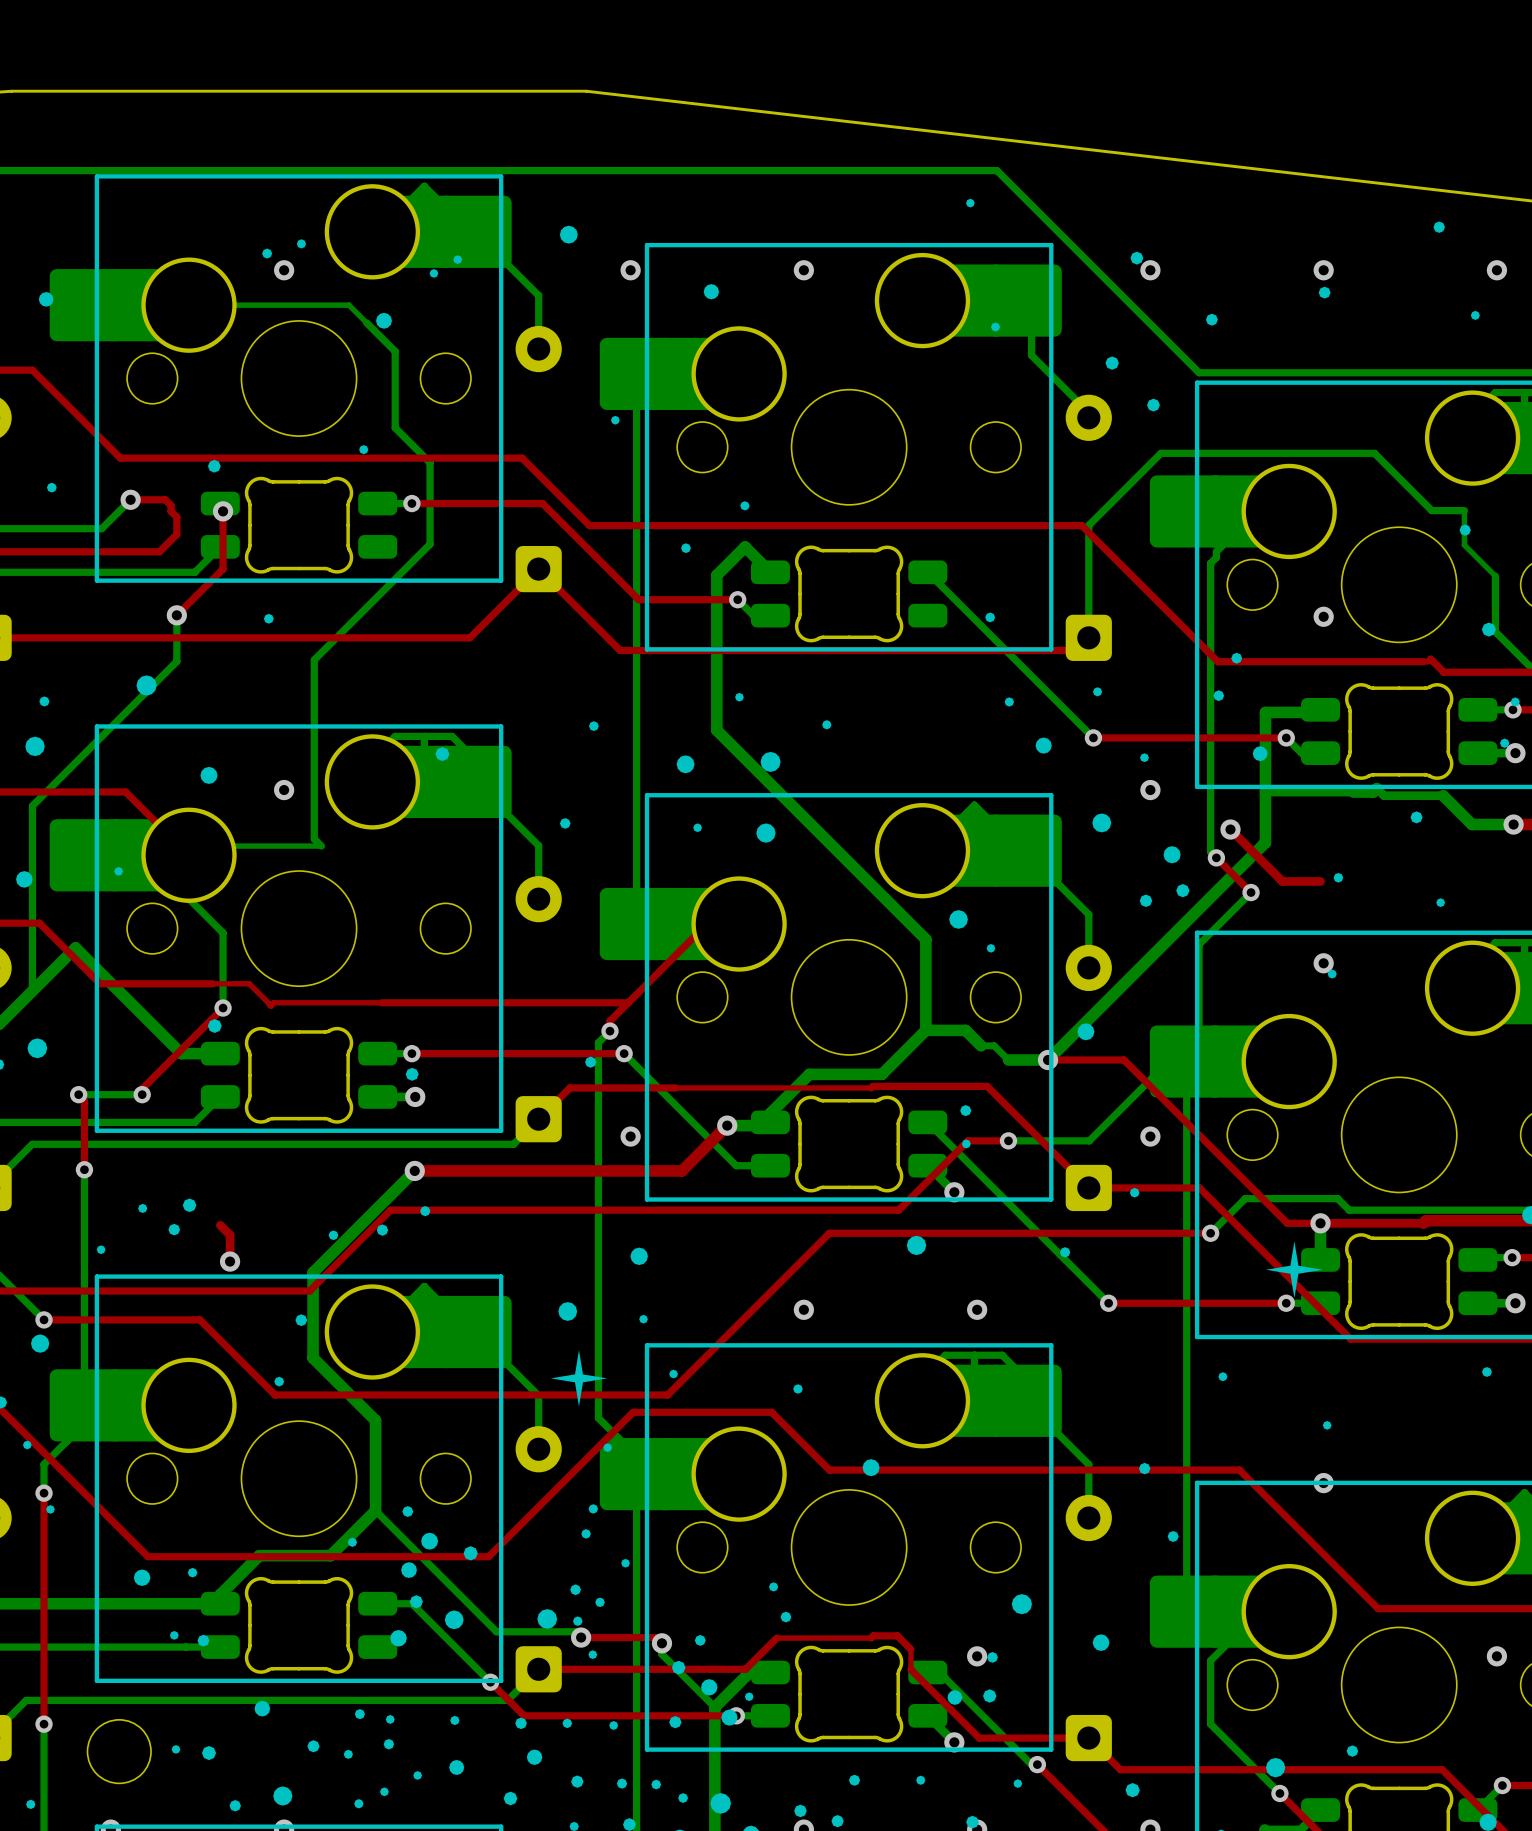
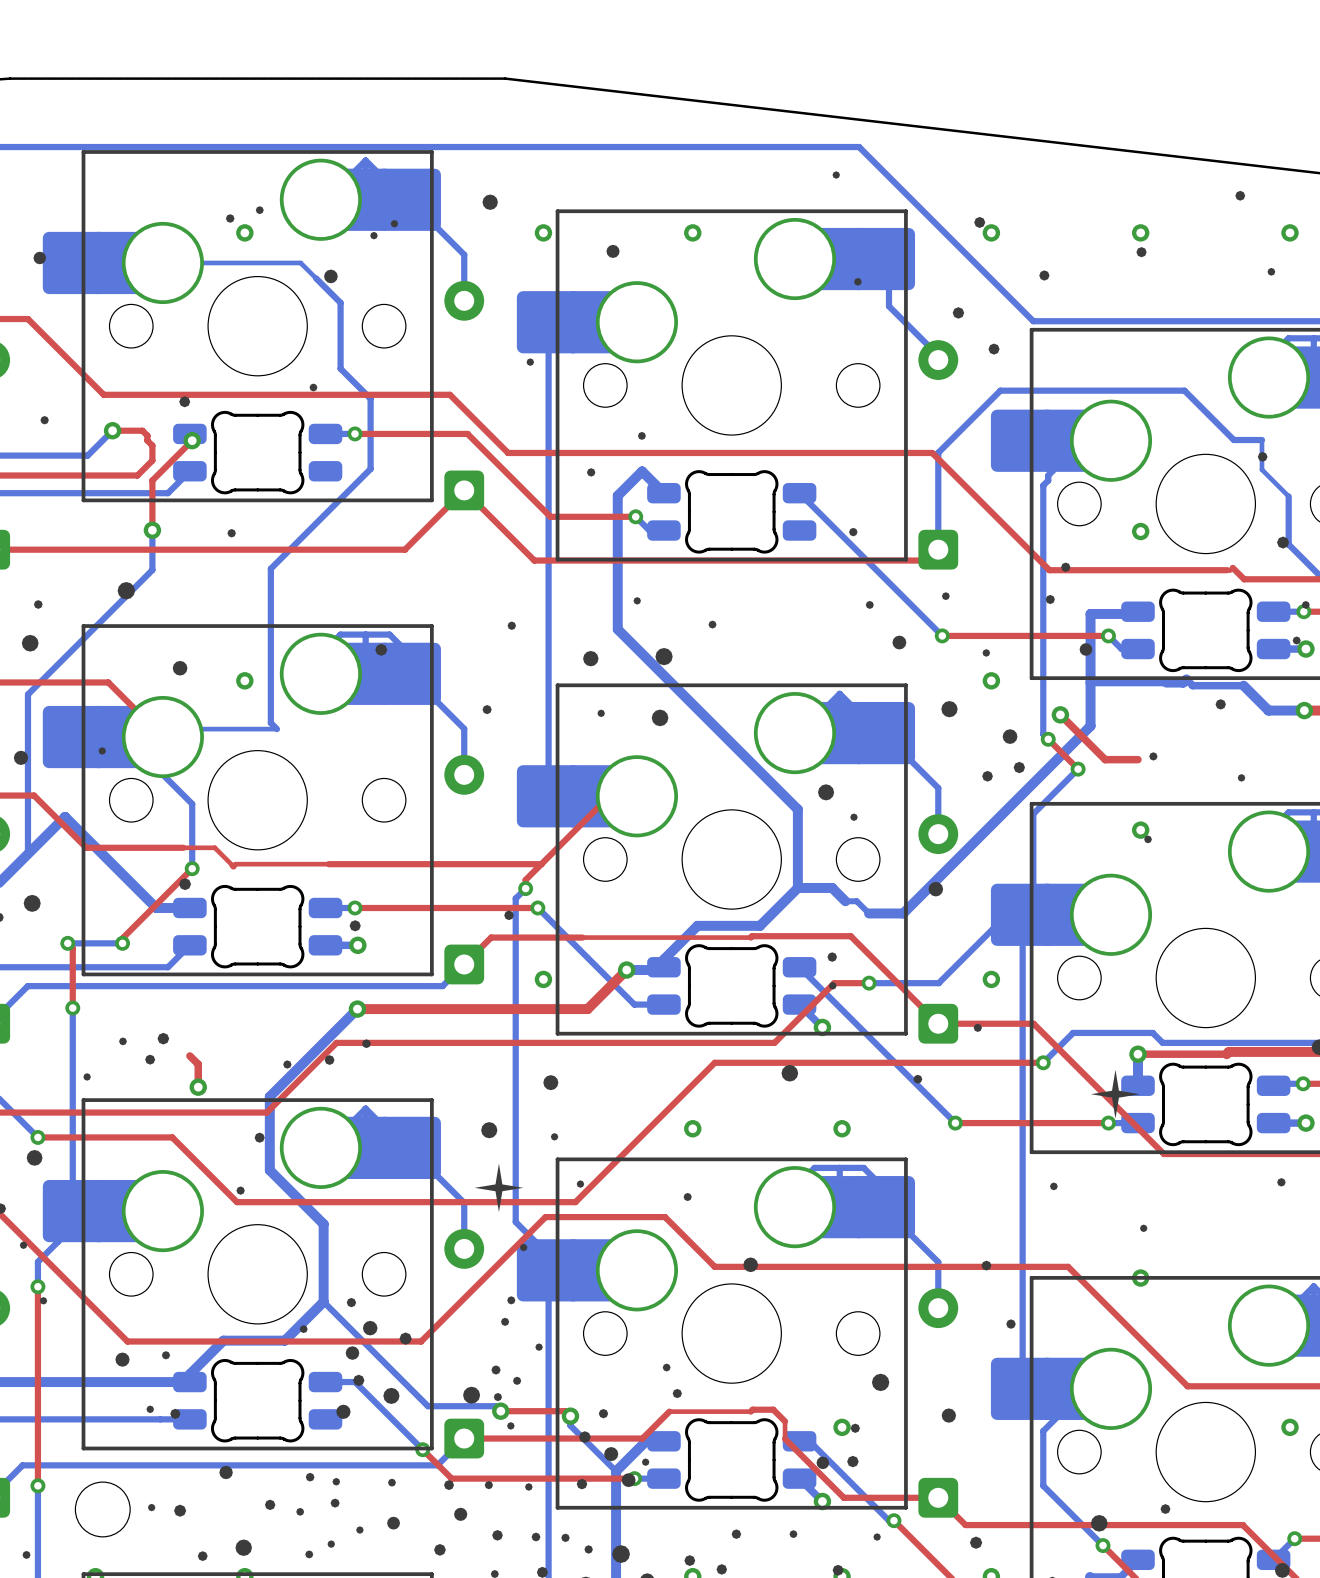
top track: (223, 511) (223, 569) (176, 615) -> (192, 440) (152, 480) (152, 530)
top track: (1048, 1060) (1124, 1060) (1287, 1223) (1320, 1223) -> none
via: (1048, 1060) -> none

